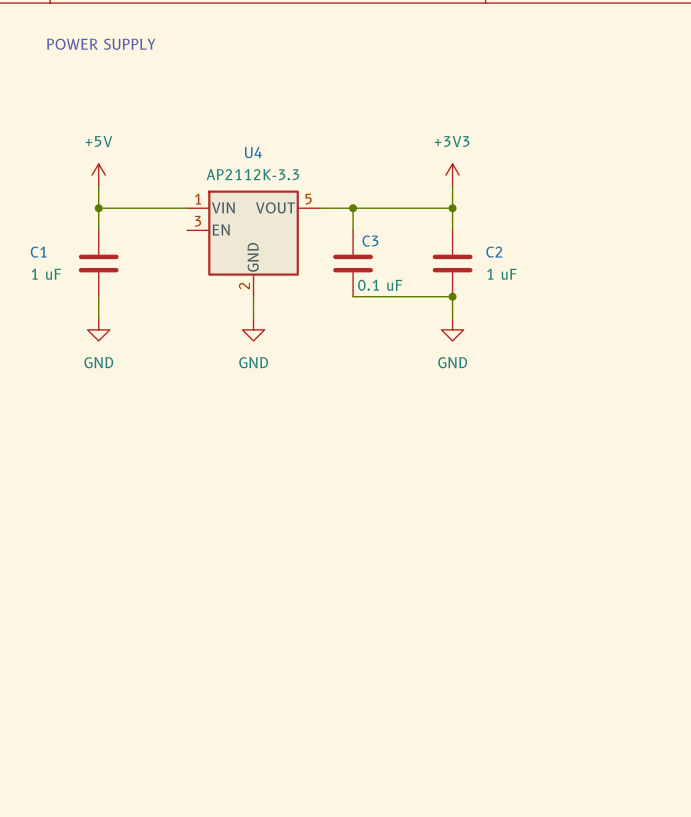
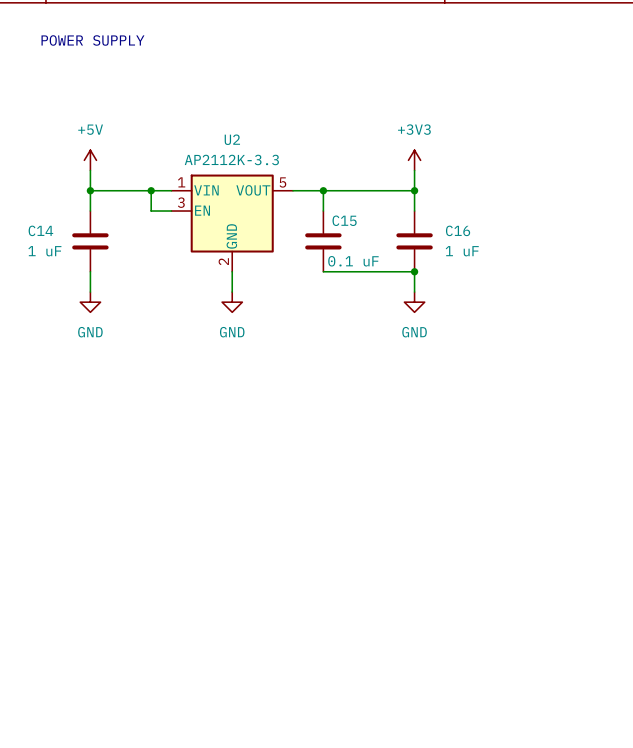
U4 name: U4 (253, 152) -> U2 (232, 139)
wire: none -> (151, 190) (151, 211) (171, 211)
junction: none -> (151, 190)
C3 name: C3 (370, 241) -> C15 (344, 220)
C1 name: C1 (38, 252) -> C14 (40, 230)
C2 name: C2 (494, 252) -> C16 (458, 230)

